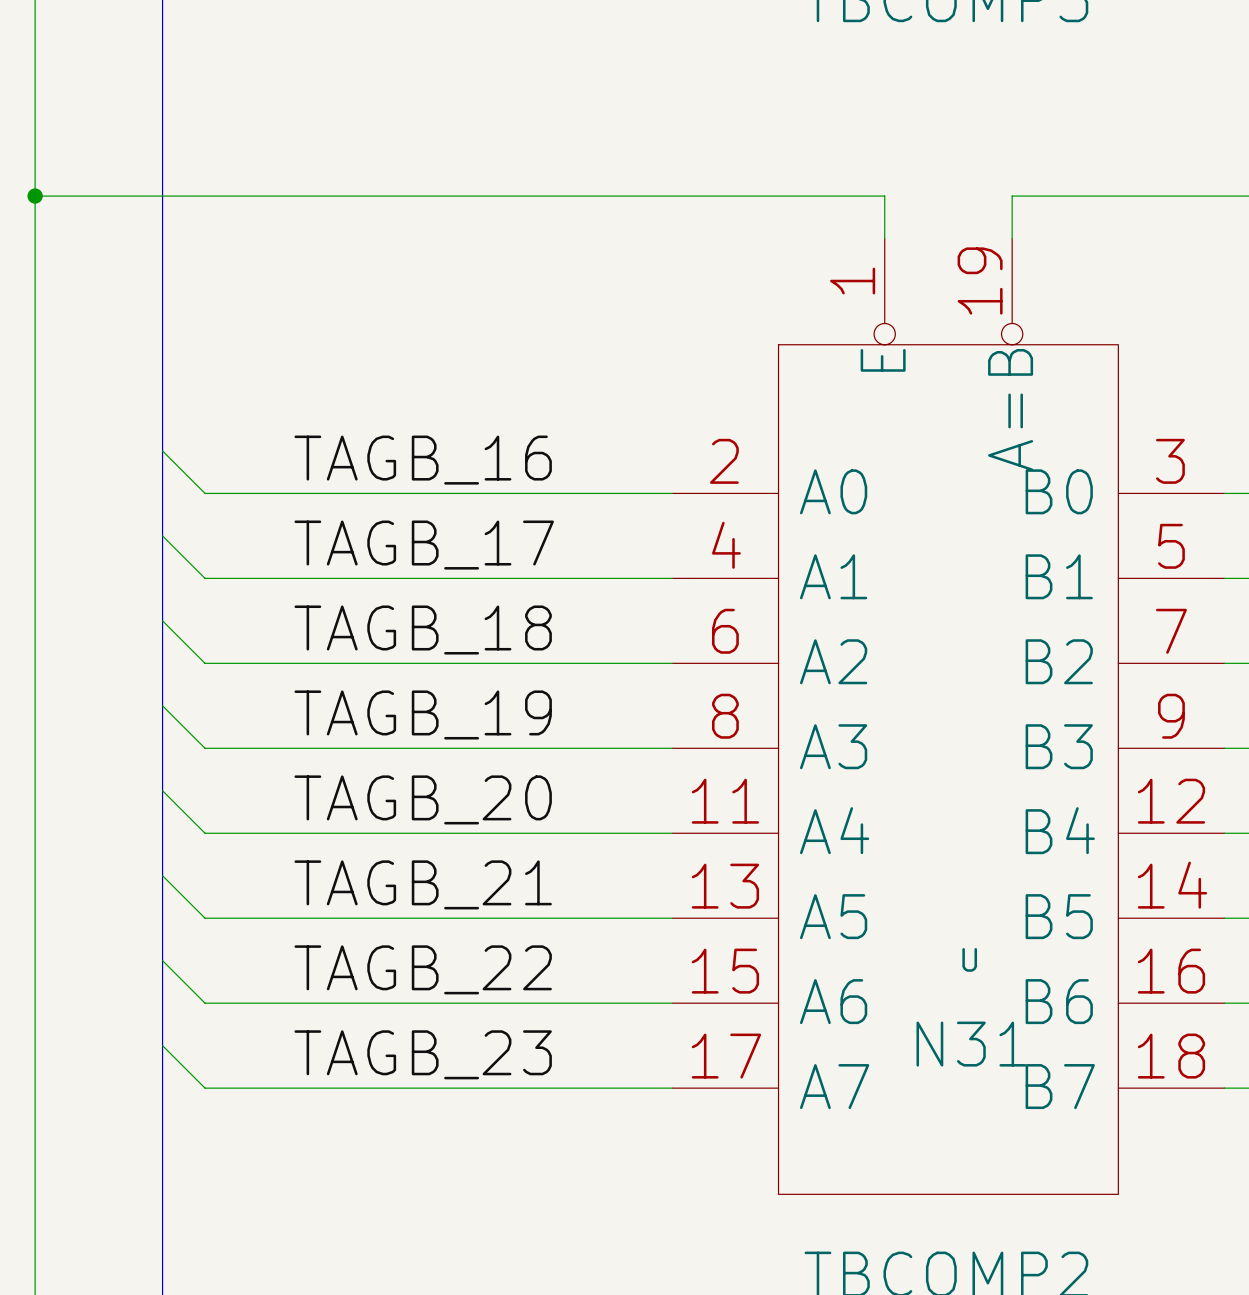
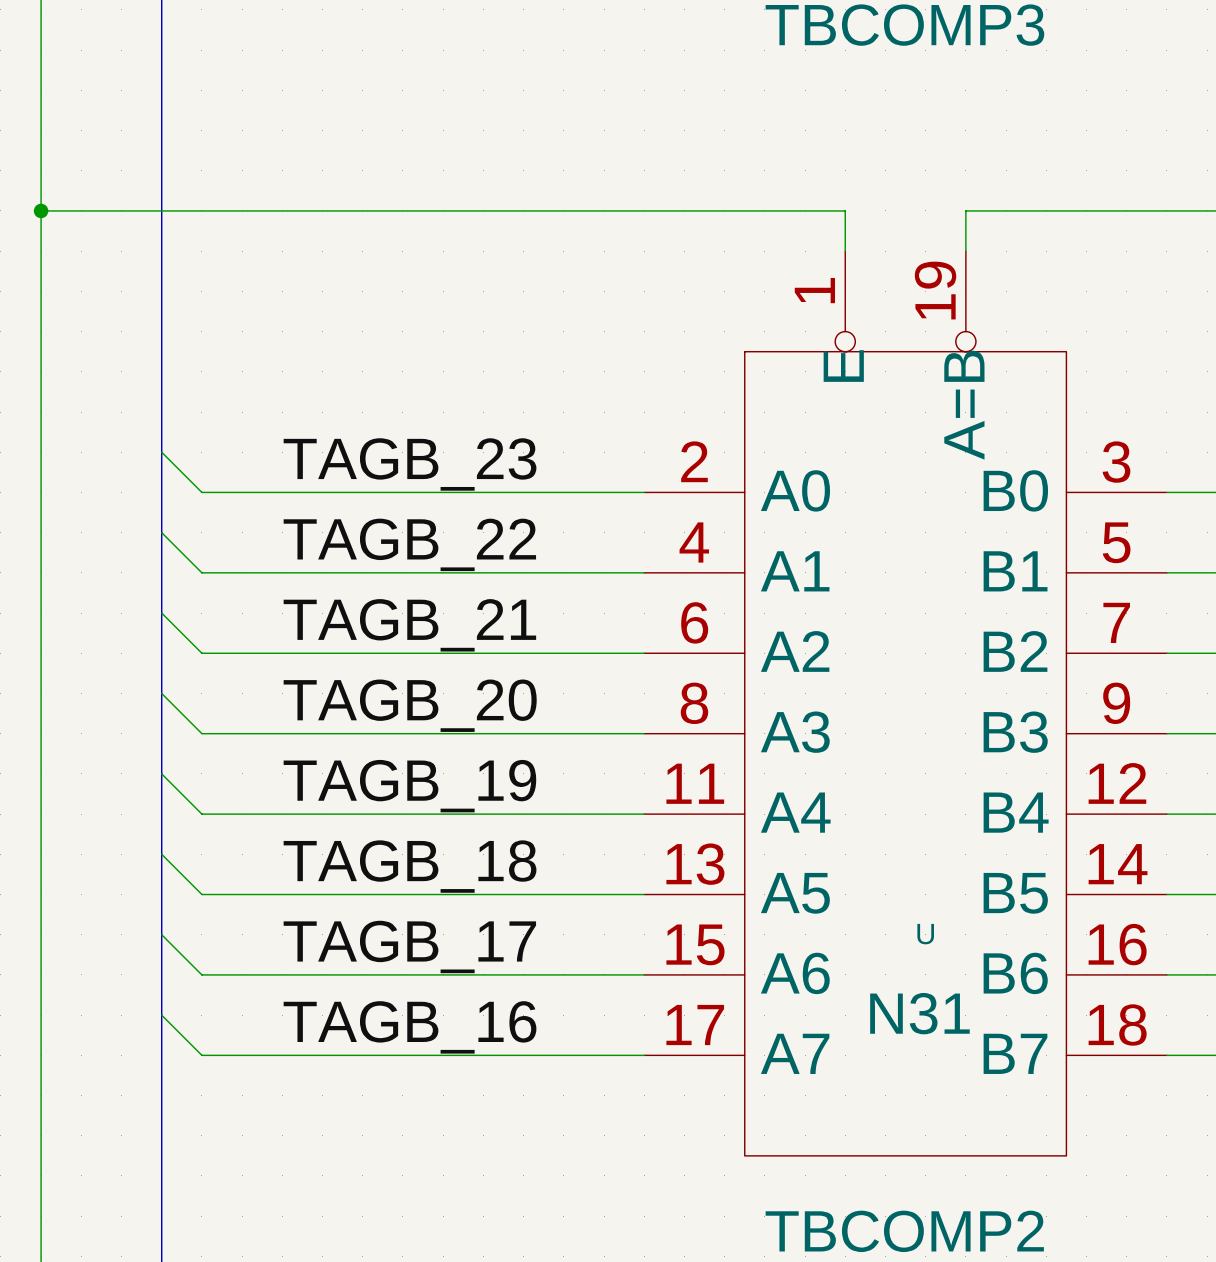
label: TAGB_16 (423, 460) -> TAGB_23 (410, 464)
label: TAGB_17 (424, 545) -> TAGB_22 (409, 544)
label: TAGB_18 (423, 630) -> TAGB_21 (409, 625)
label: TAGB_19 (423, 714) -> TAGB_20 (410, 705)
label: TAGB_20 (423, 799) -> TAGB_19 (409, 786)
label: TAGB_21 (423, 884) -> TAGB_18 (410, 866)
label: TAGB_22 (423, 969) -> TAGB_17 (409, 946)
label: TAGB_23 (423, 1054) -> TAGB_16 (410, 1027)

